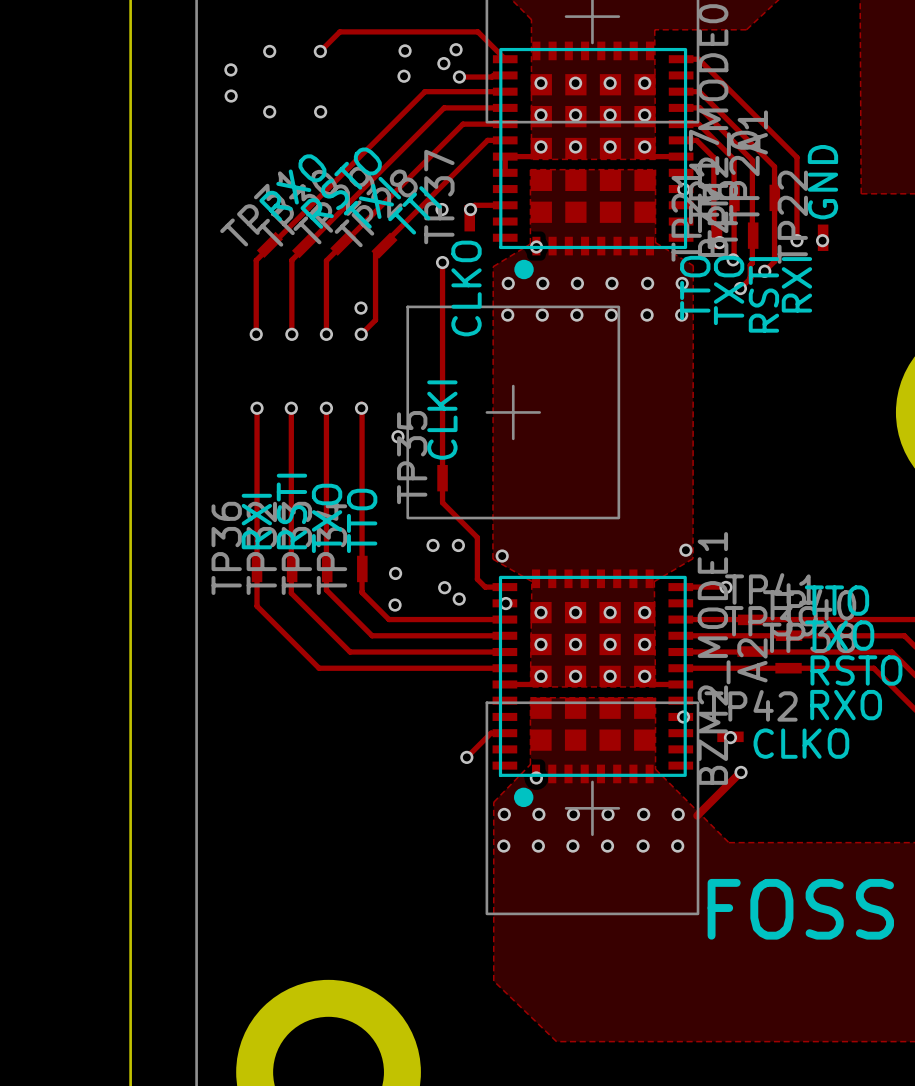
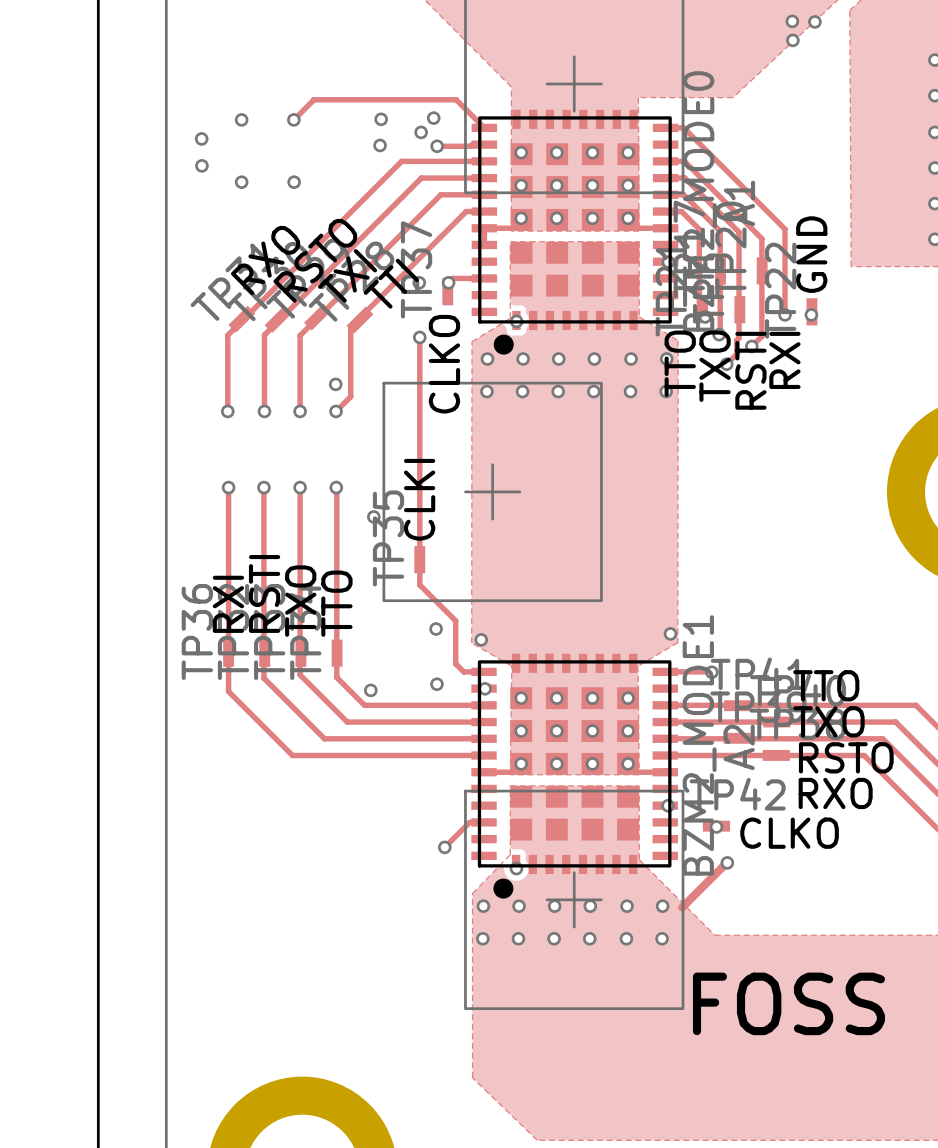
via: (433, 545) -> none
via: (395, 573) -> none
via: (444, 587) -> none

